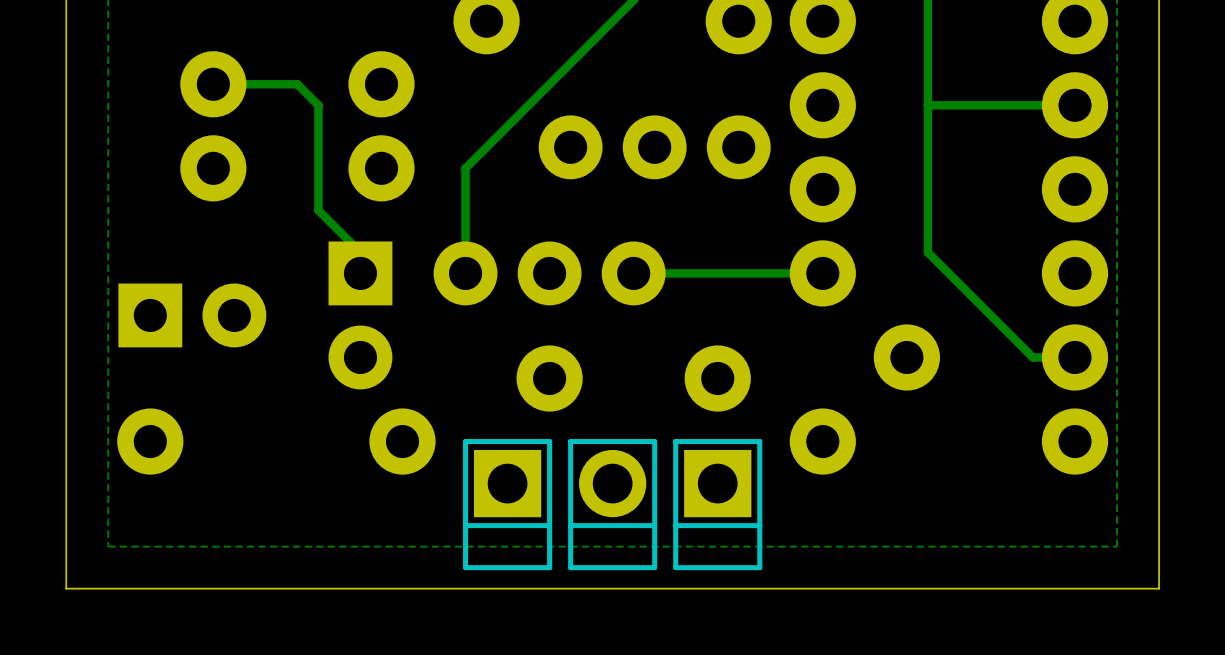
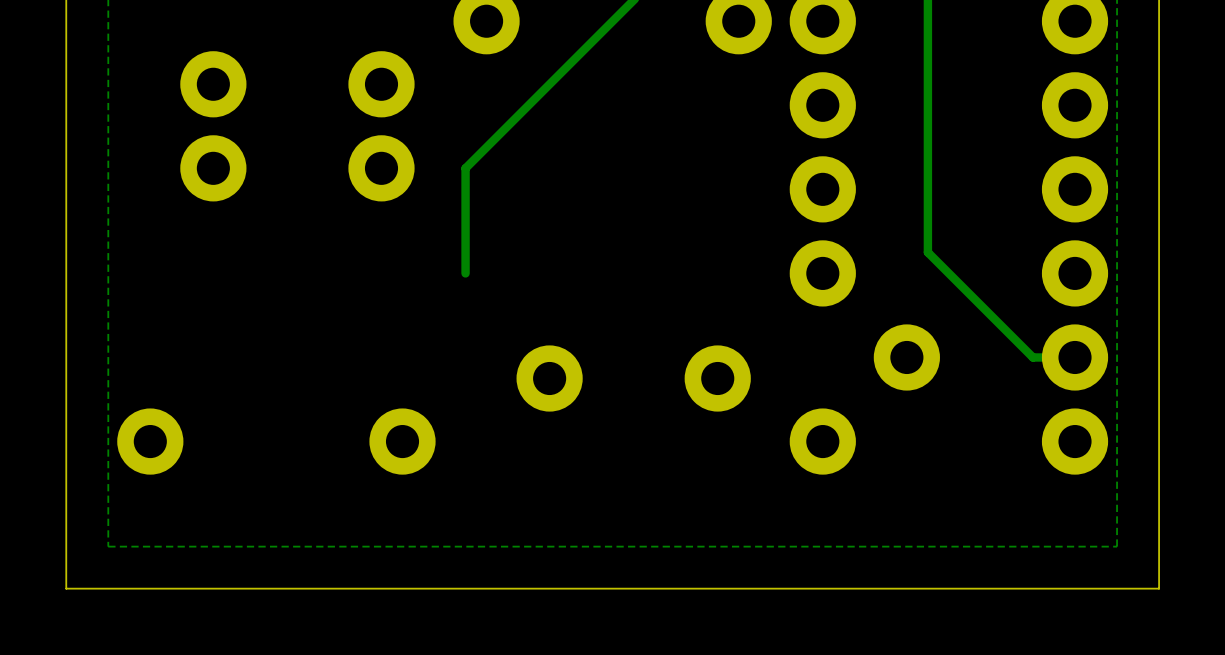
track: (213, 84) (297, 84) (318, 105) (318, 210) (360, 252) (360, 273) -> none
track: (1075, 105) (927, 105) -> none
part: (654, 147) -> none
part: (549, 273) -> none
track: (822, 273) (633, 273) -> none
part: (192, 315) -> none
part: (360, 315) -> none
part: (507, 504) -> none
part: (612, 504) -> none
part: (717, 504) -> none

